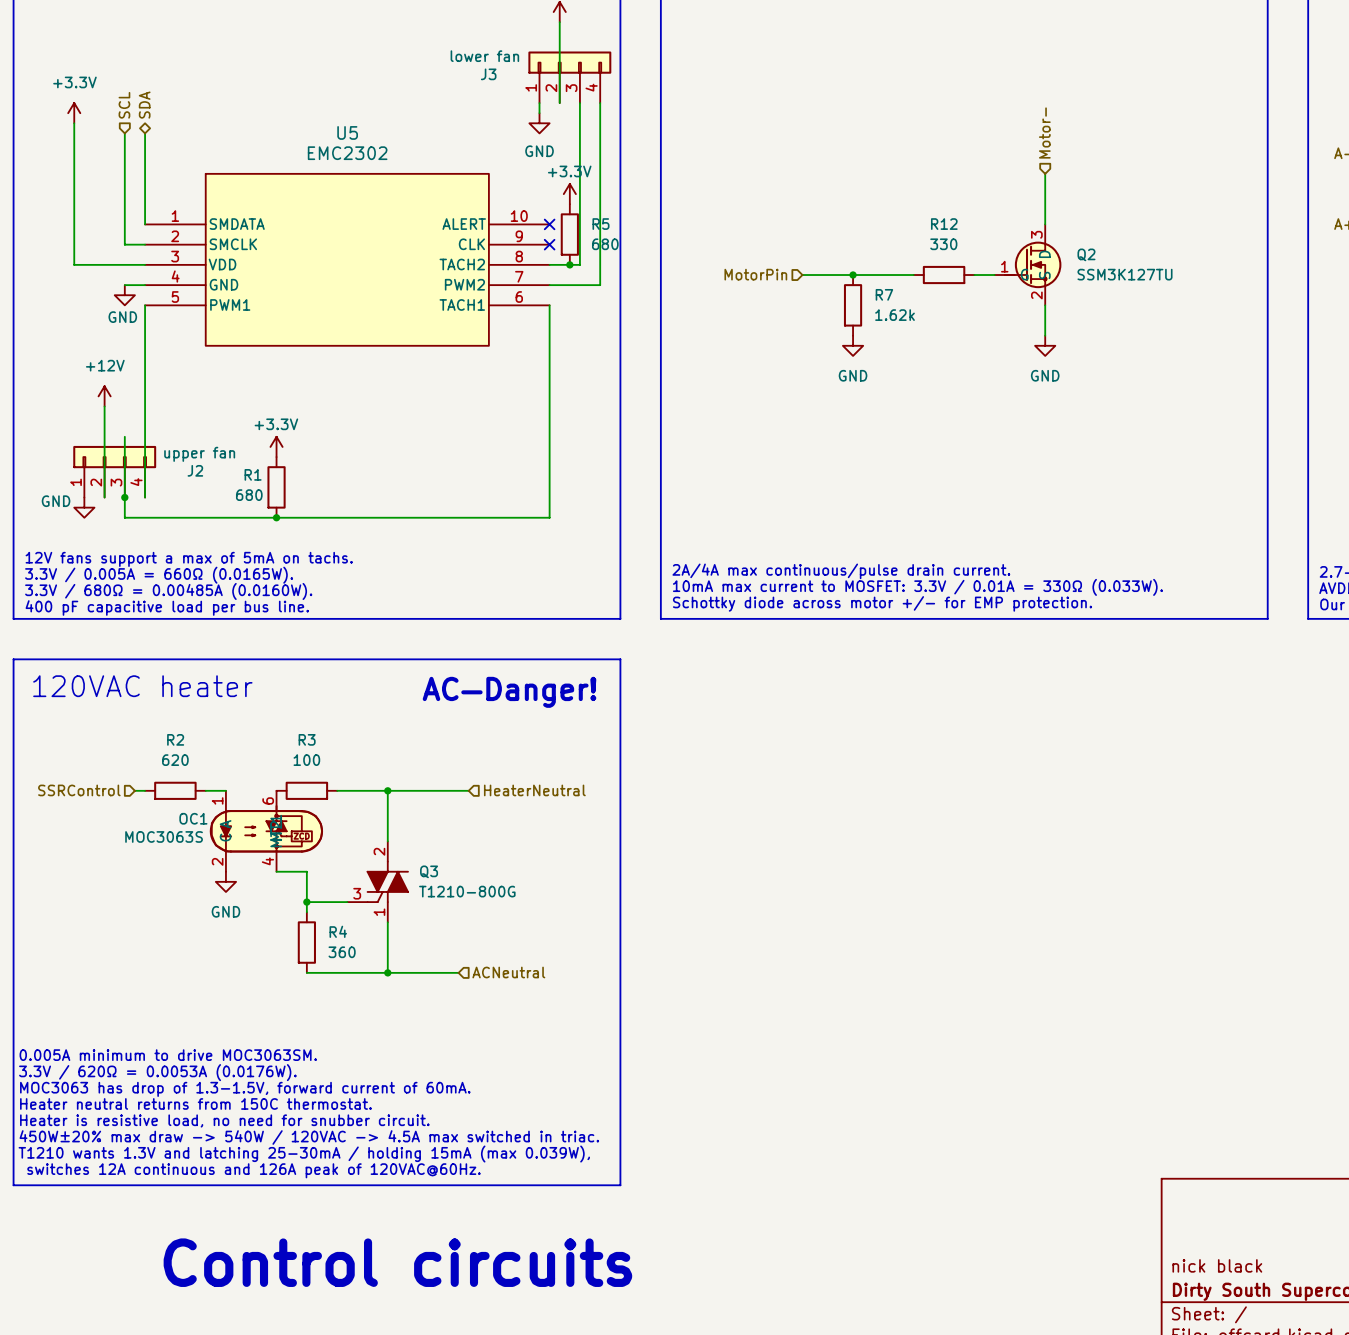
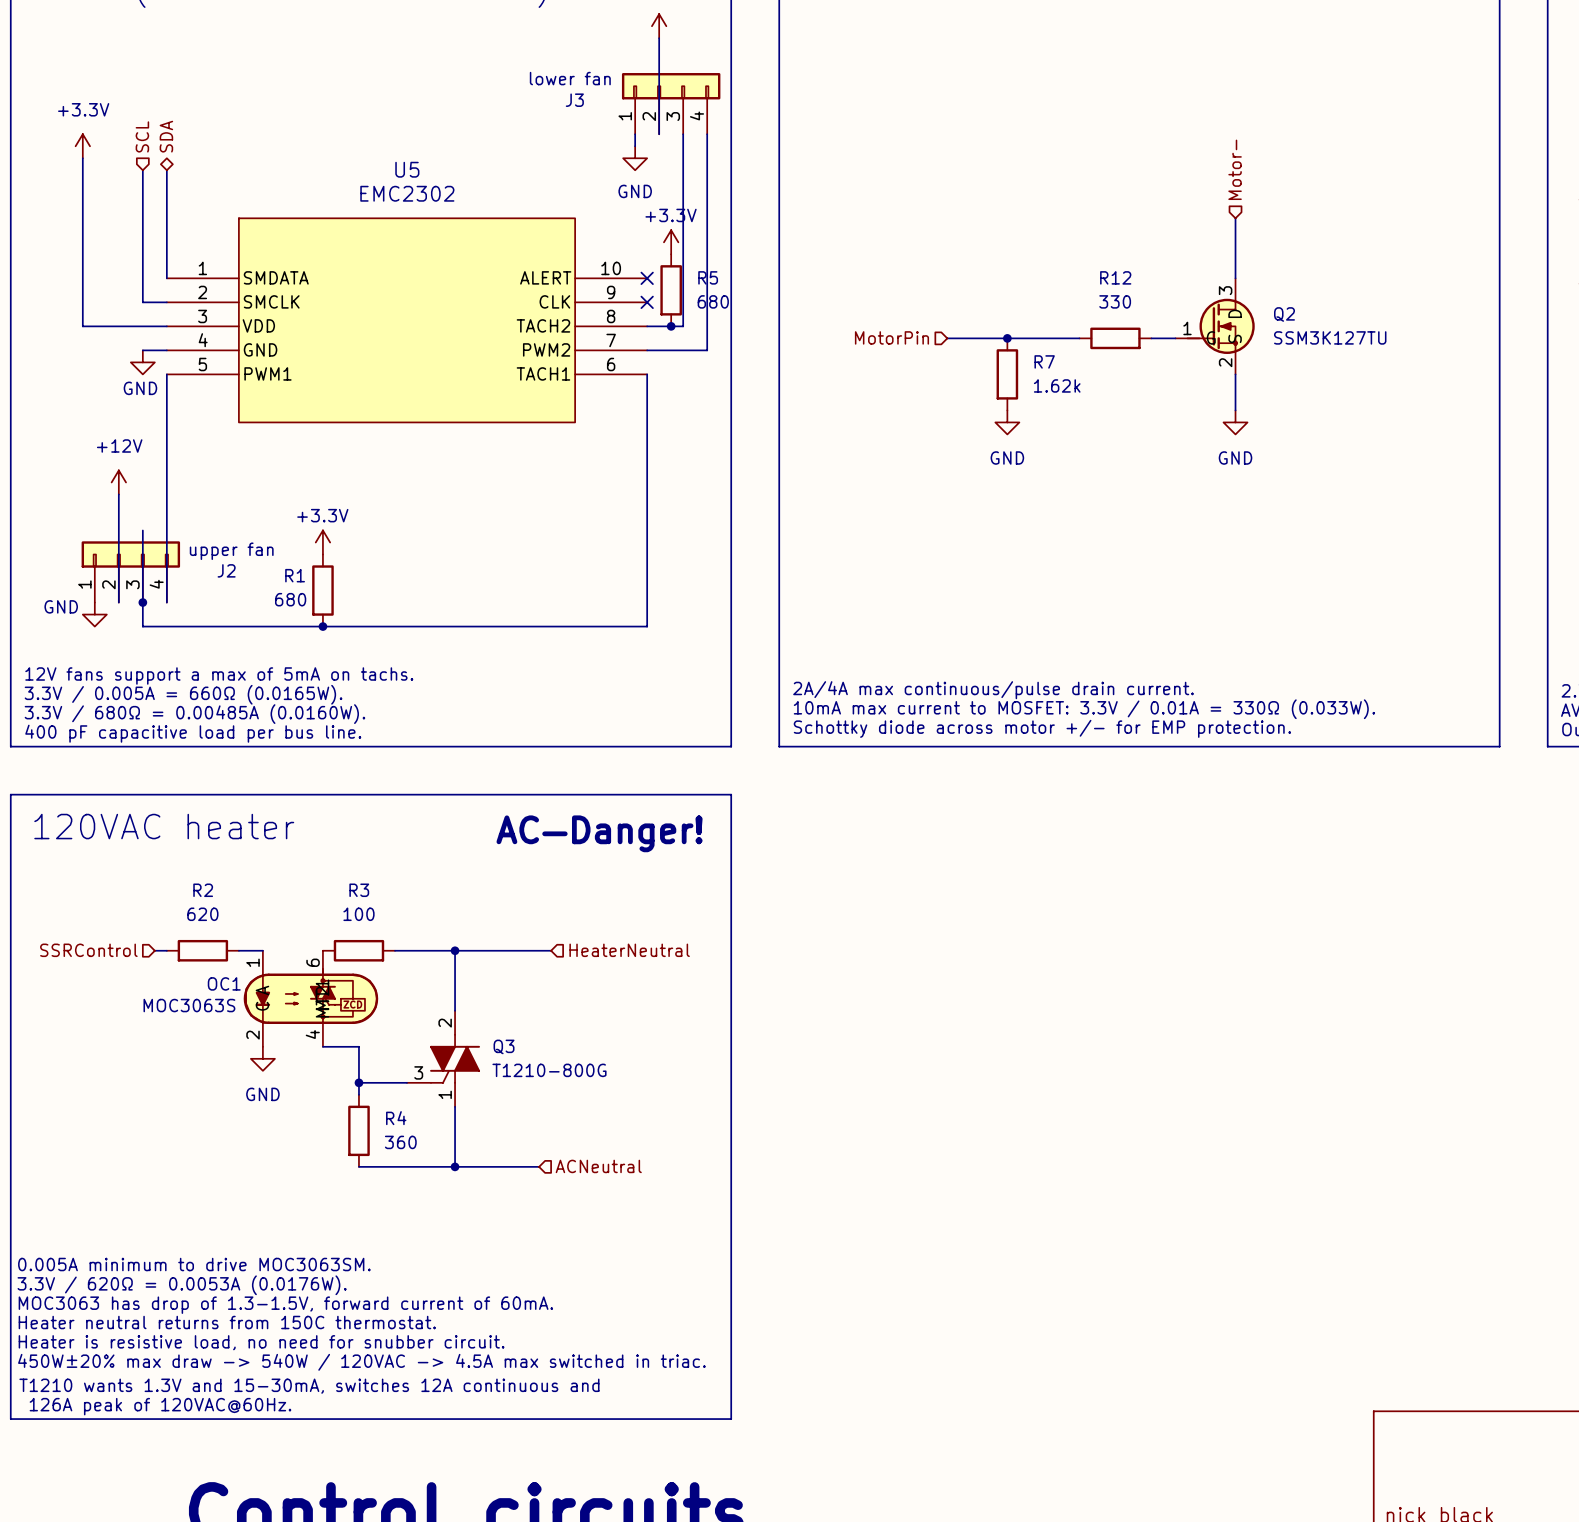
text: T1210 wants 1.3V and latching 25-30mA / holding 15mA (max 0.039W), (304, 1154) -> T1210 wants 1.3V and 15-30mA, switches 12A continuous and (309, 1386)
text: switches 12A continuous and 126A peak of 120VAC@60Hz. (253, 1170) -> 126A peak of 120VAC@60Hz. (160, 1406)

